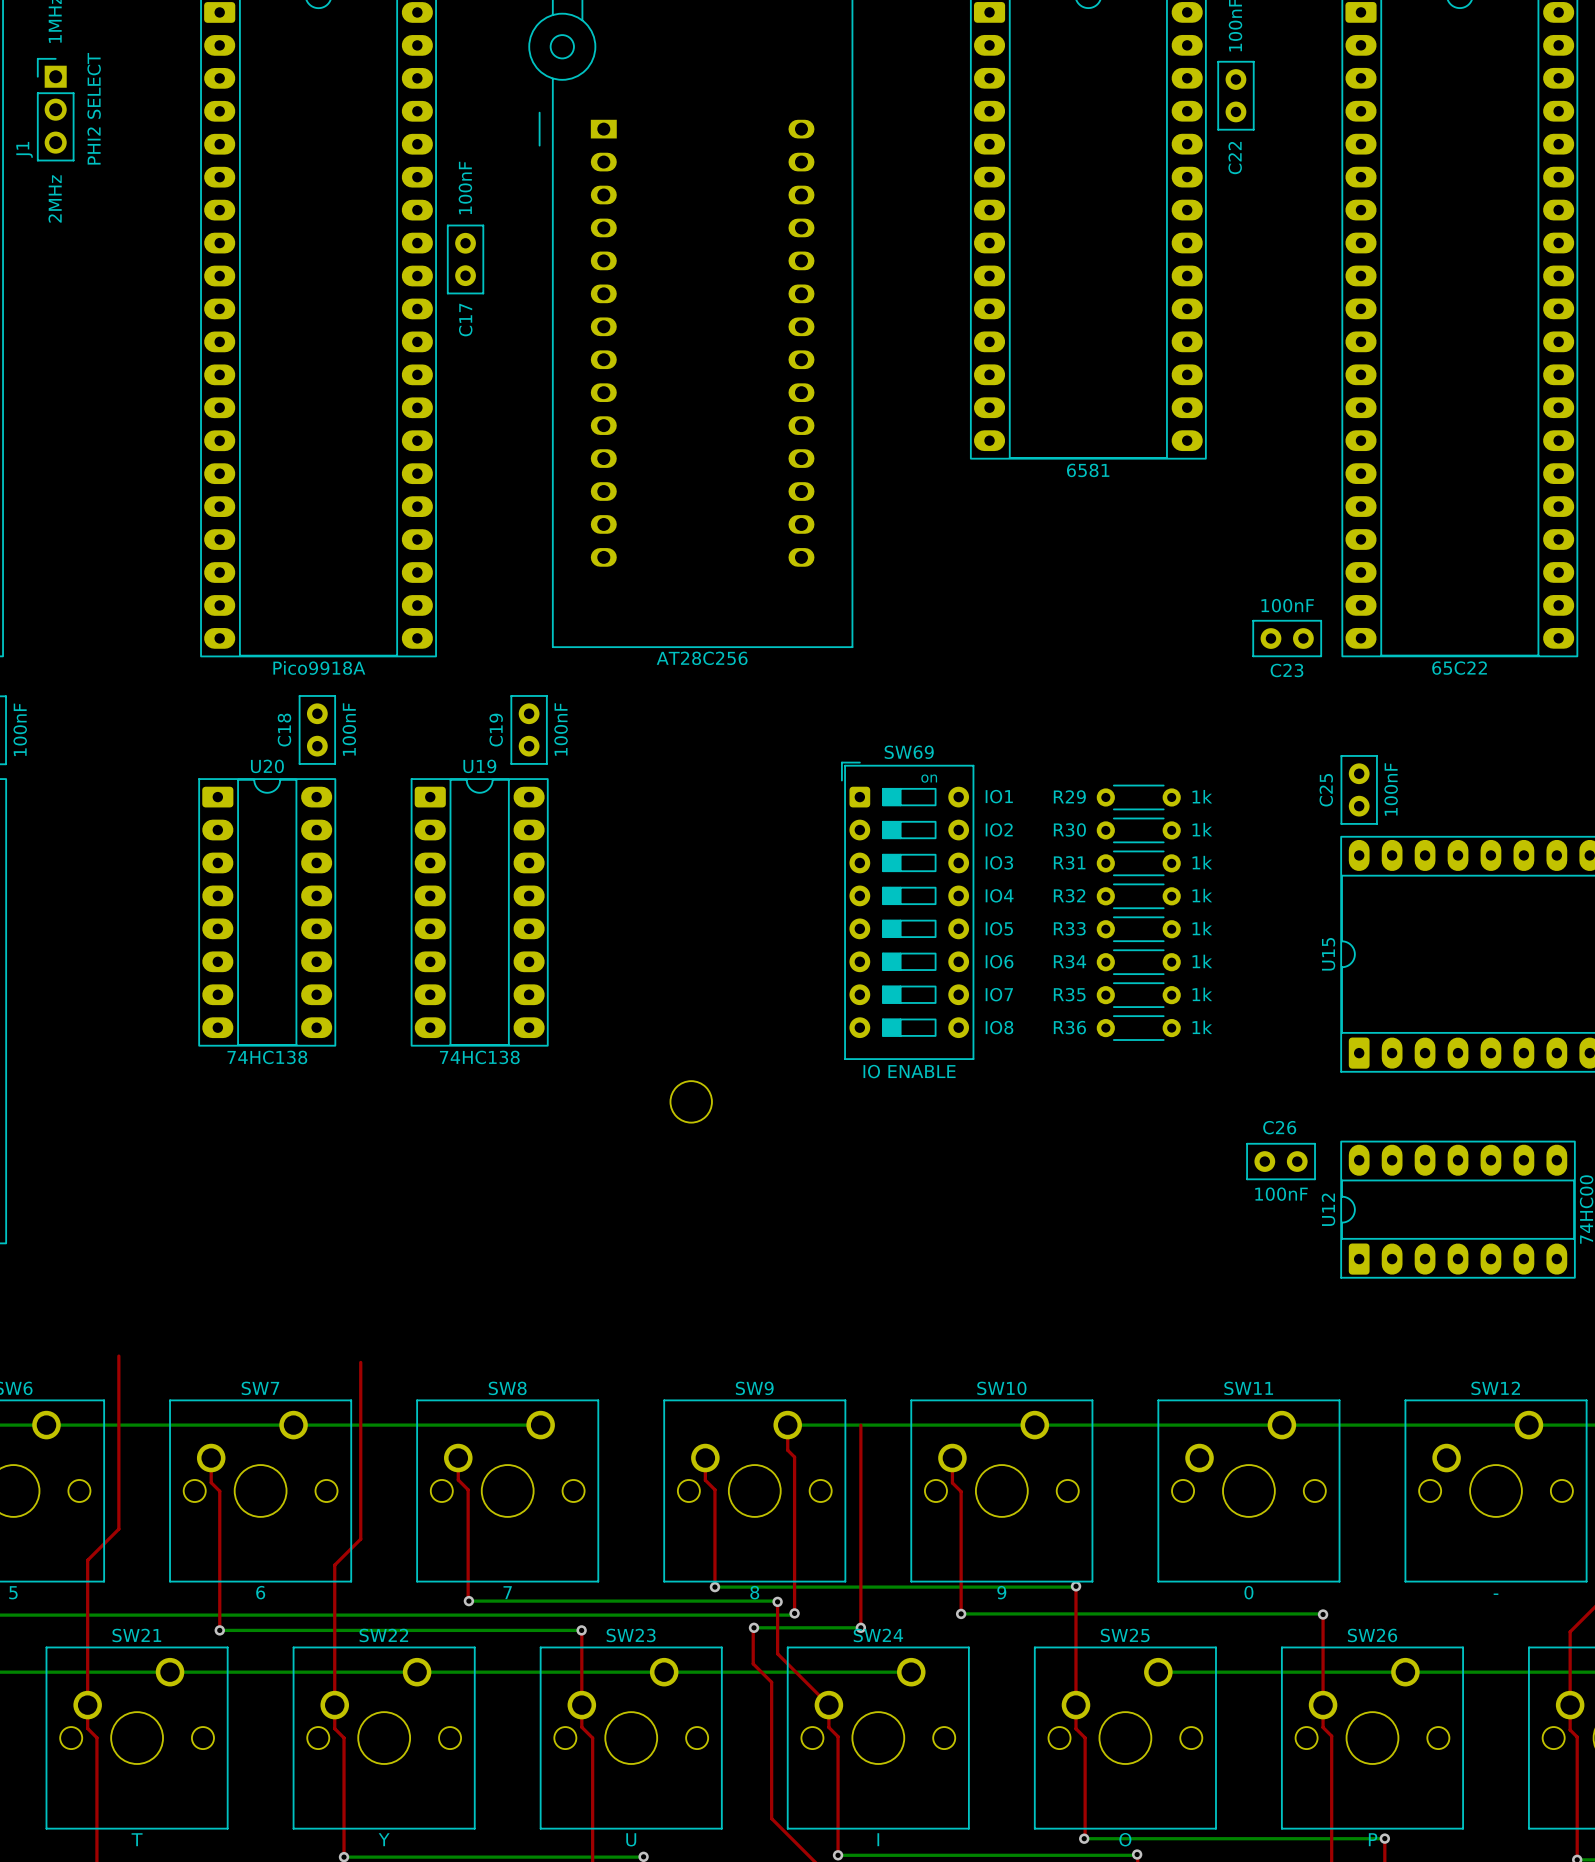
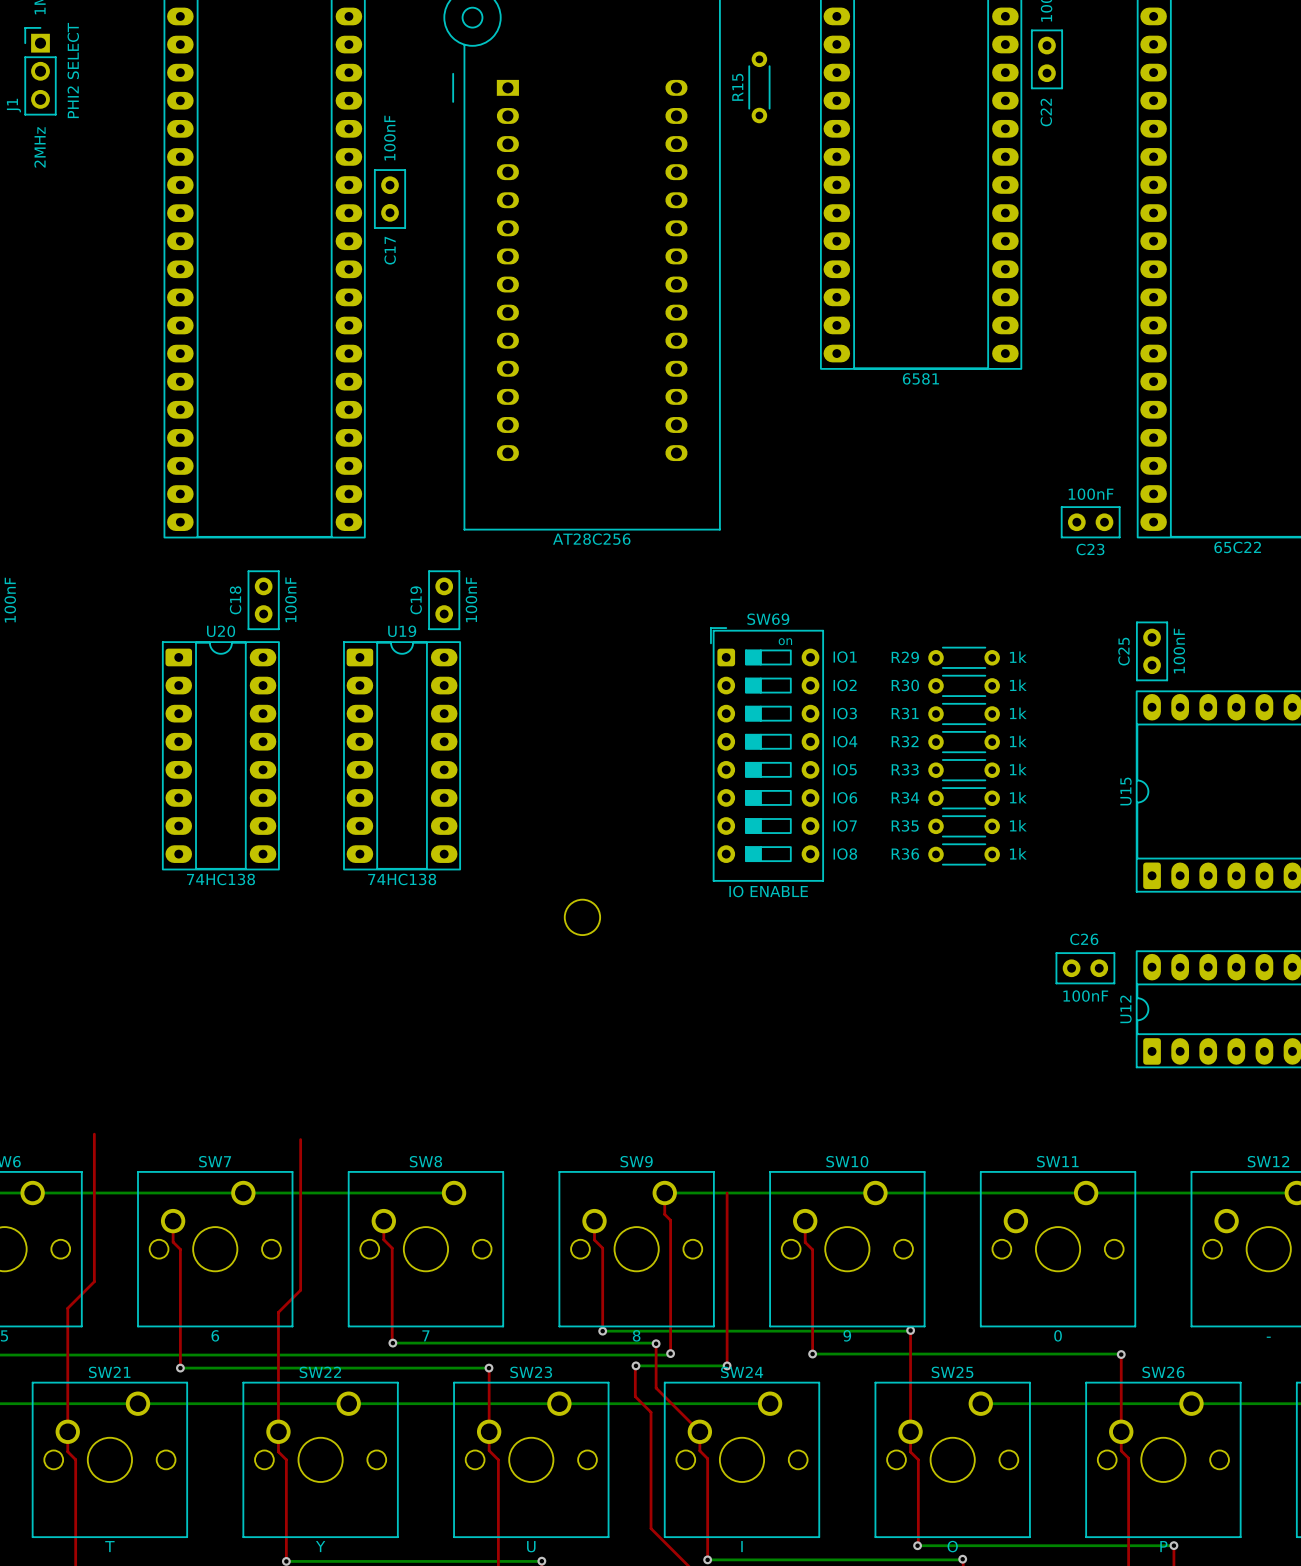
R15: none -> (759, 87)
part value: Pico9918A (319, 667) -> none

